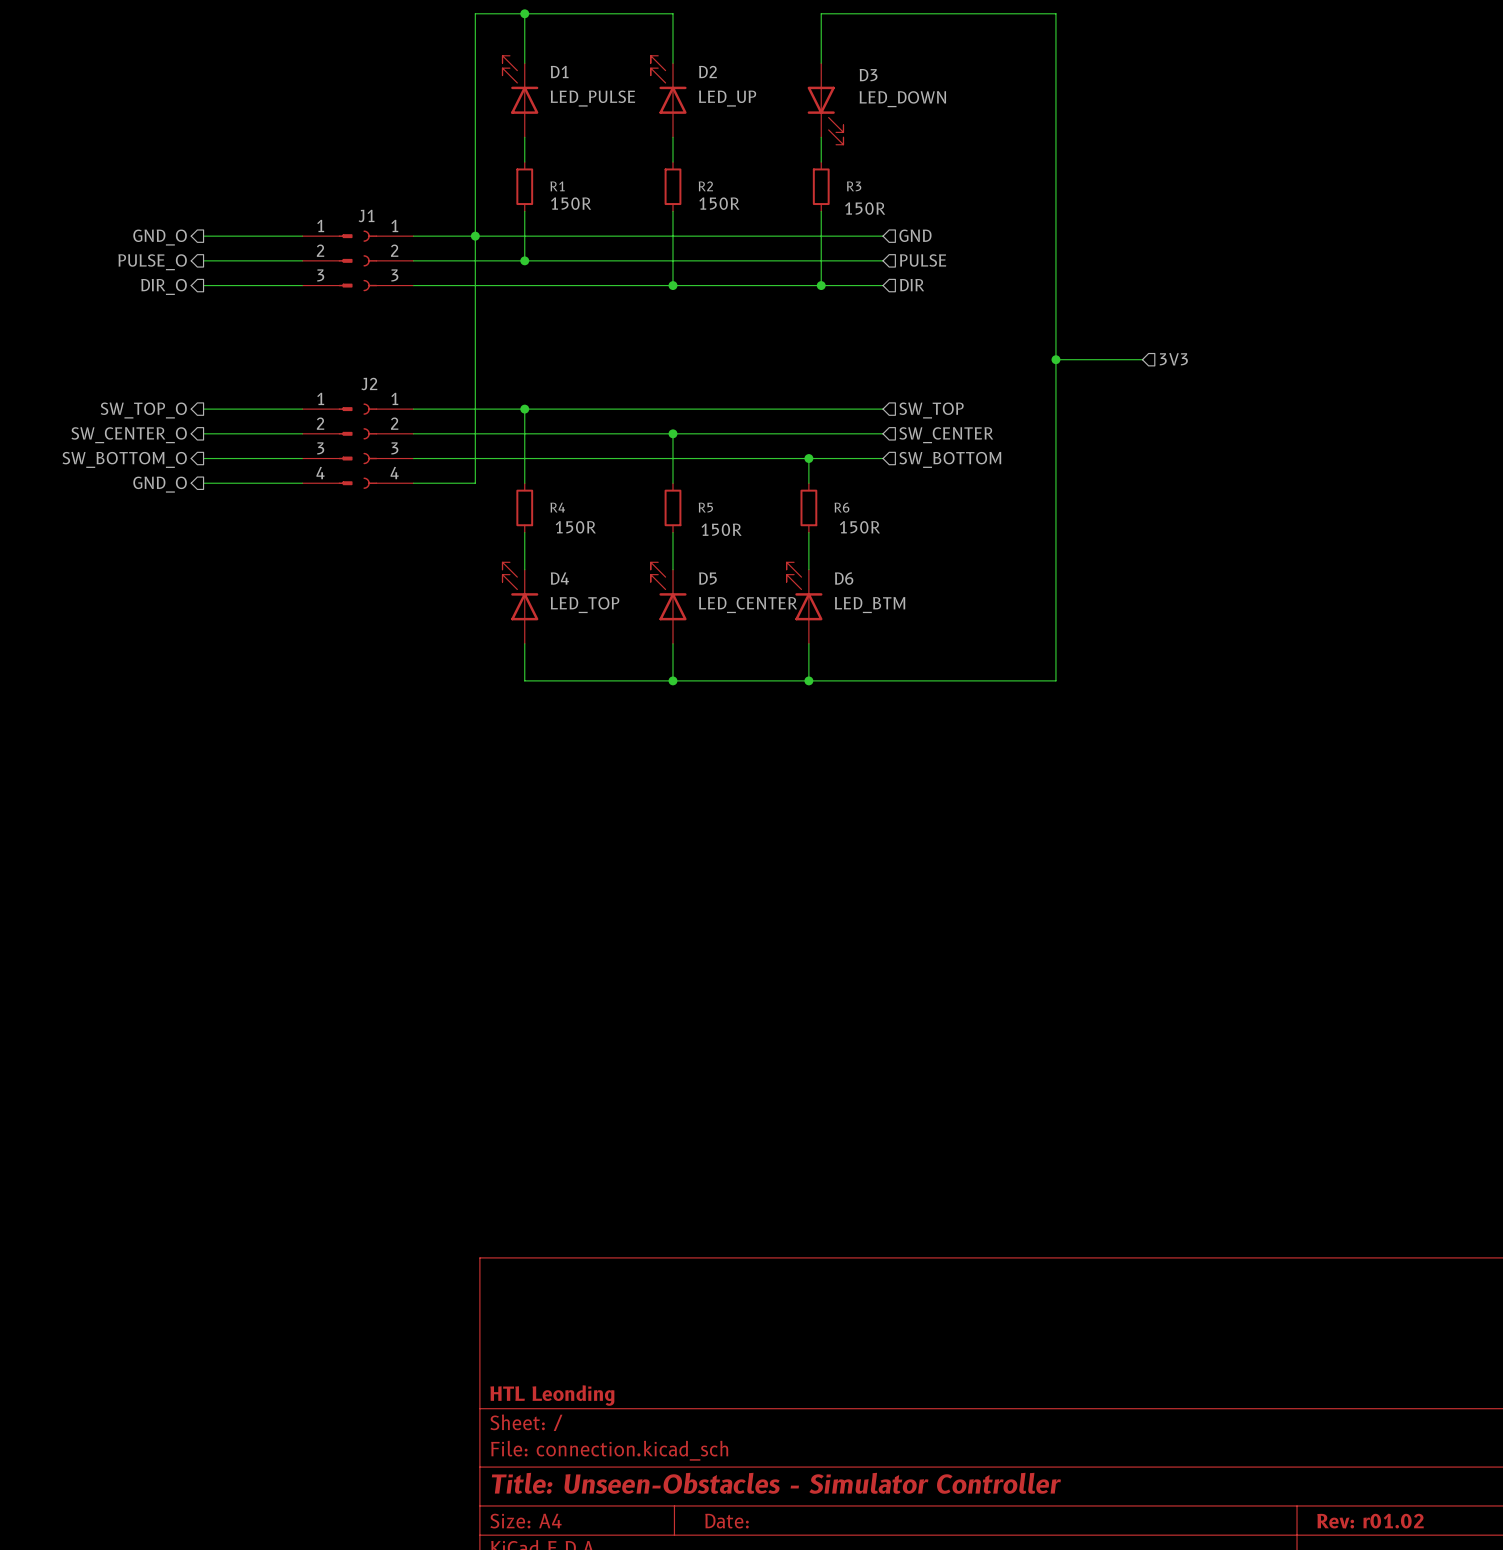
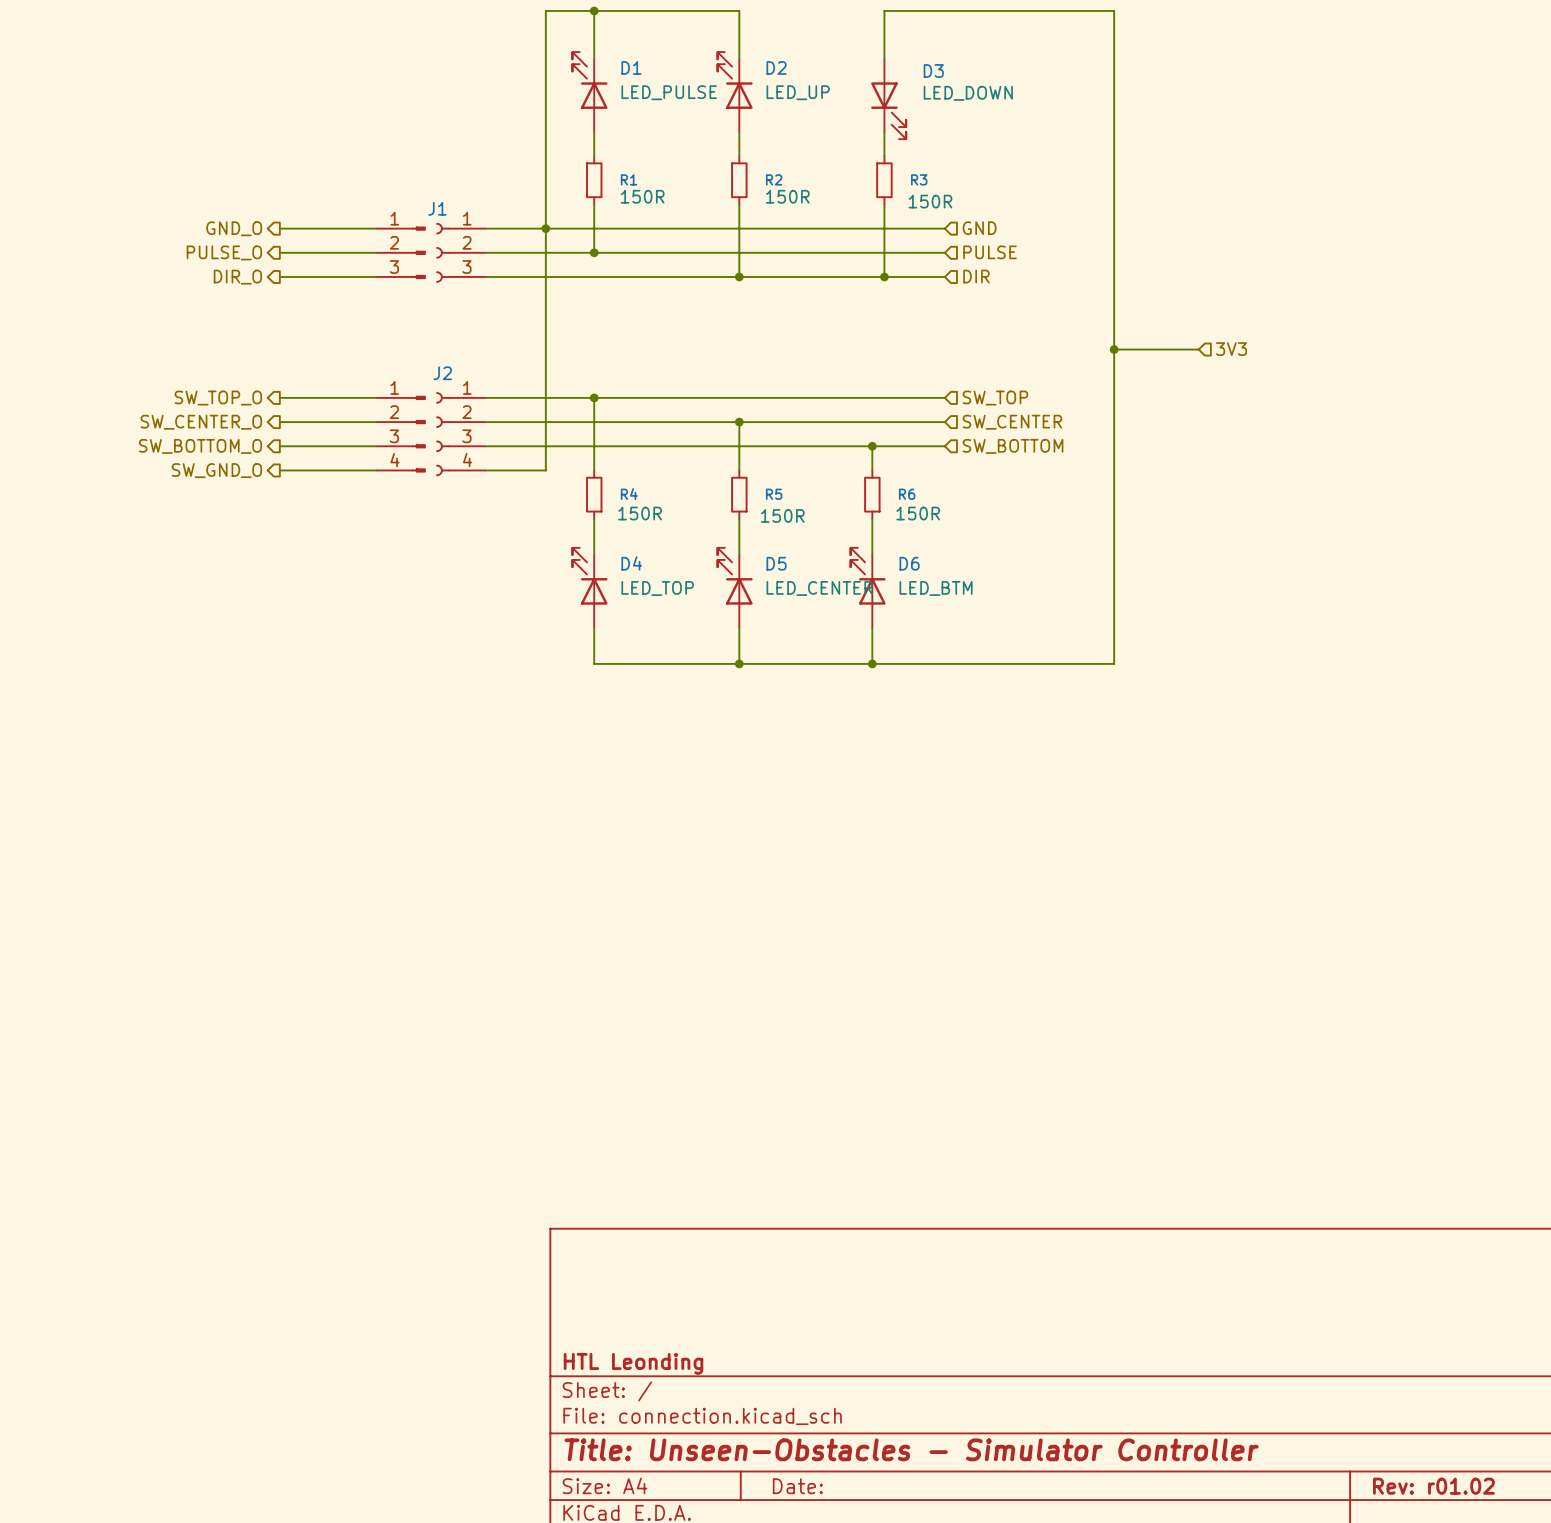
hierarchical label: GND_O (160, 484) -> SW_GND_O (216, 470)

